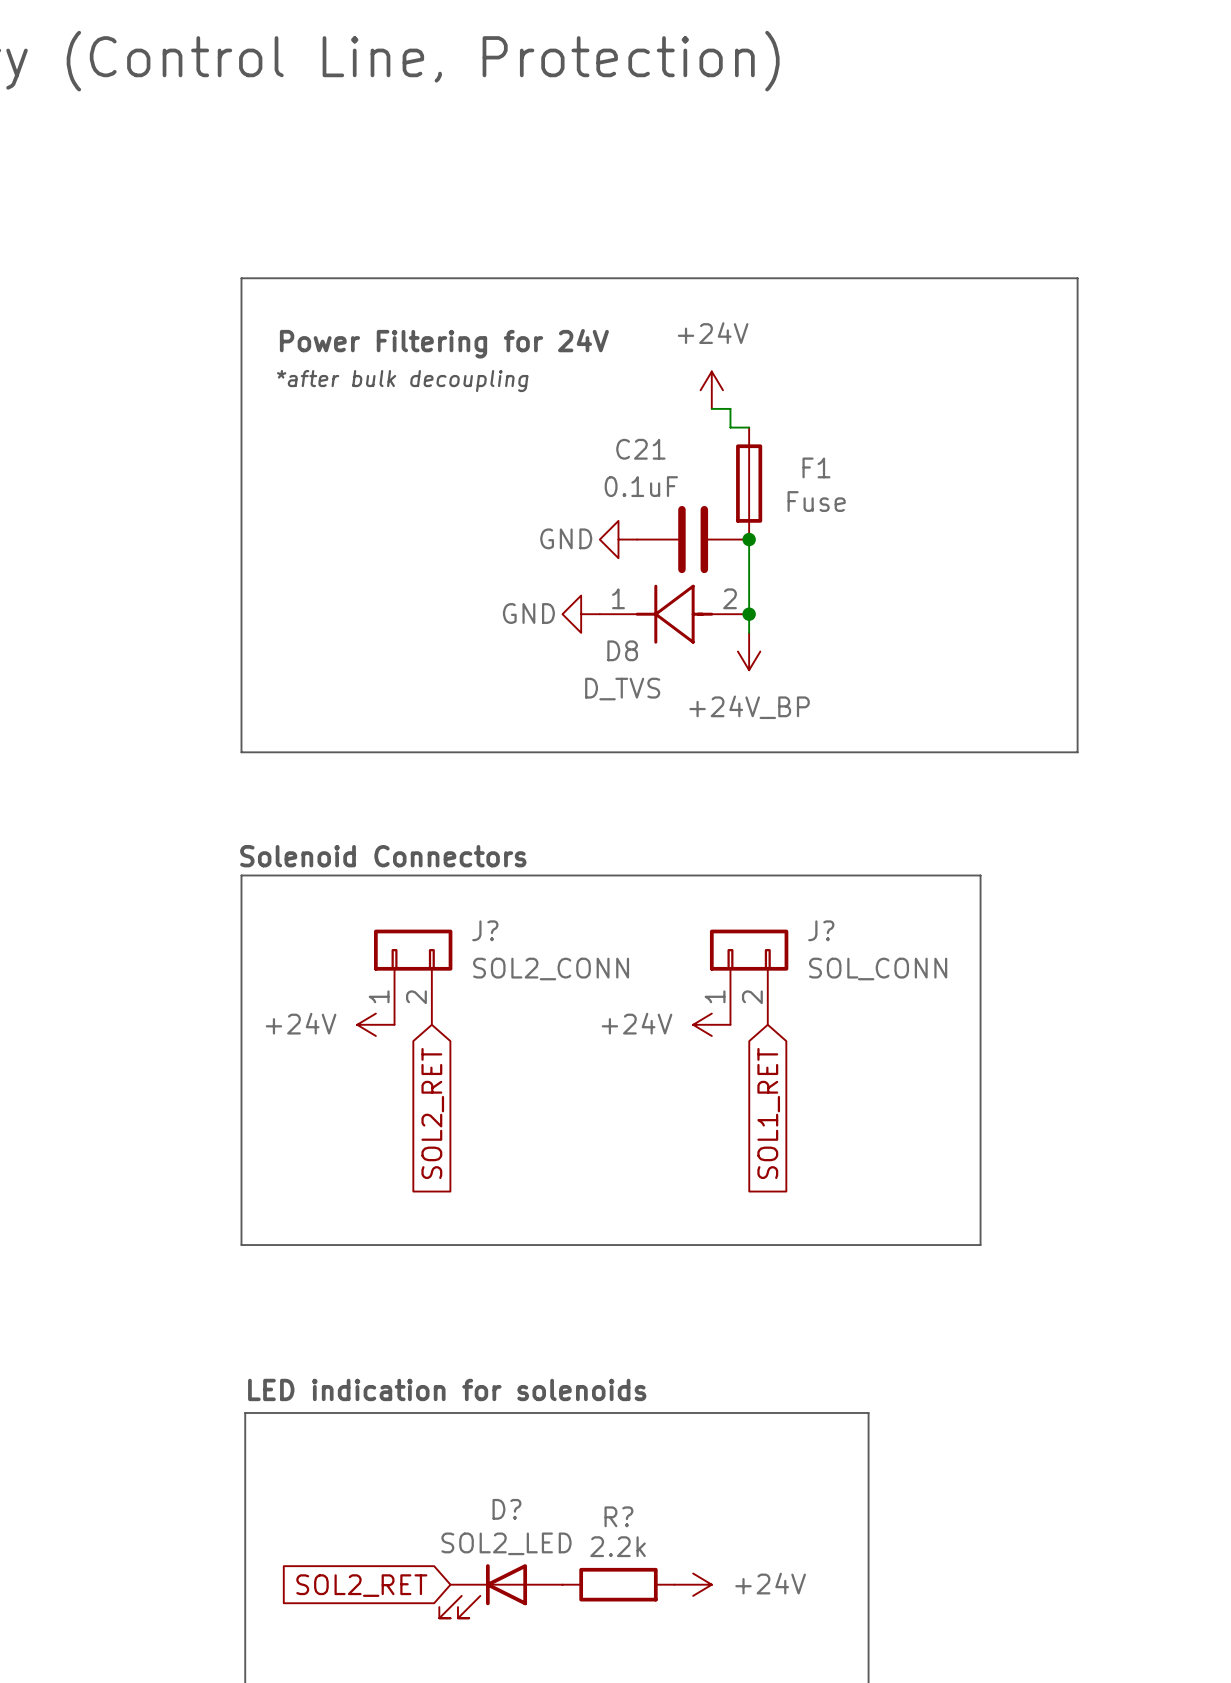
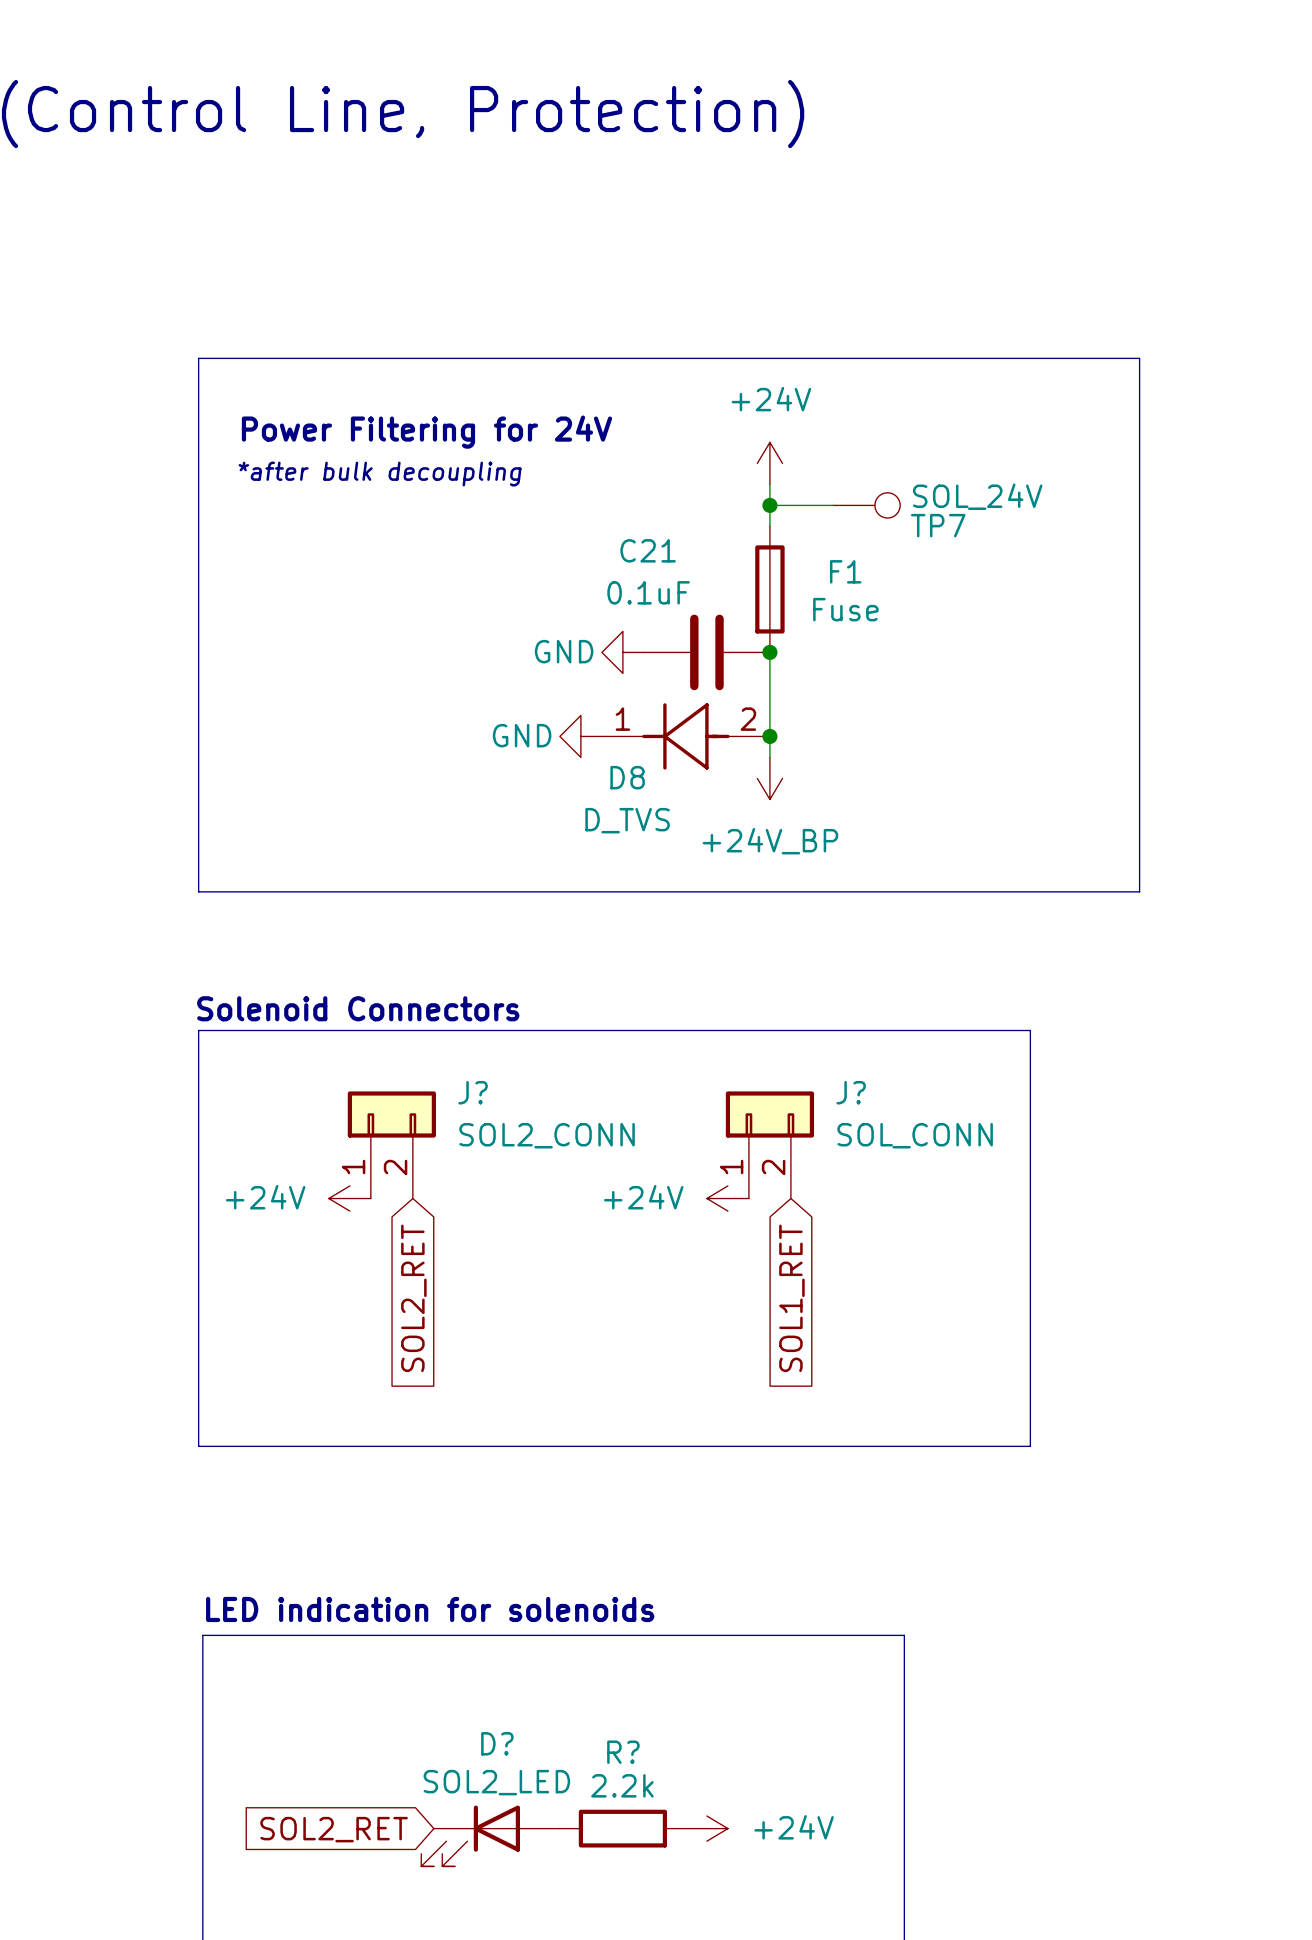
power symbol position: +24V (711, 390) -> +24V (769, 463)
wire: (711, 408) (730, 408) (730, 427) (749, 427) -> (769, 484) (769, 526)
wire: none -> (769, 505) (832, 505)
junction: none -> (769, 505)
TP7: none -> SOL_24V (866, 505)

